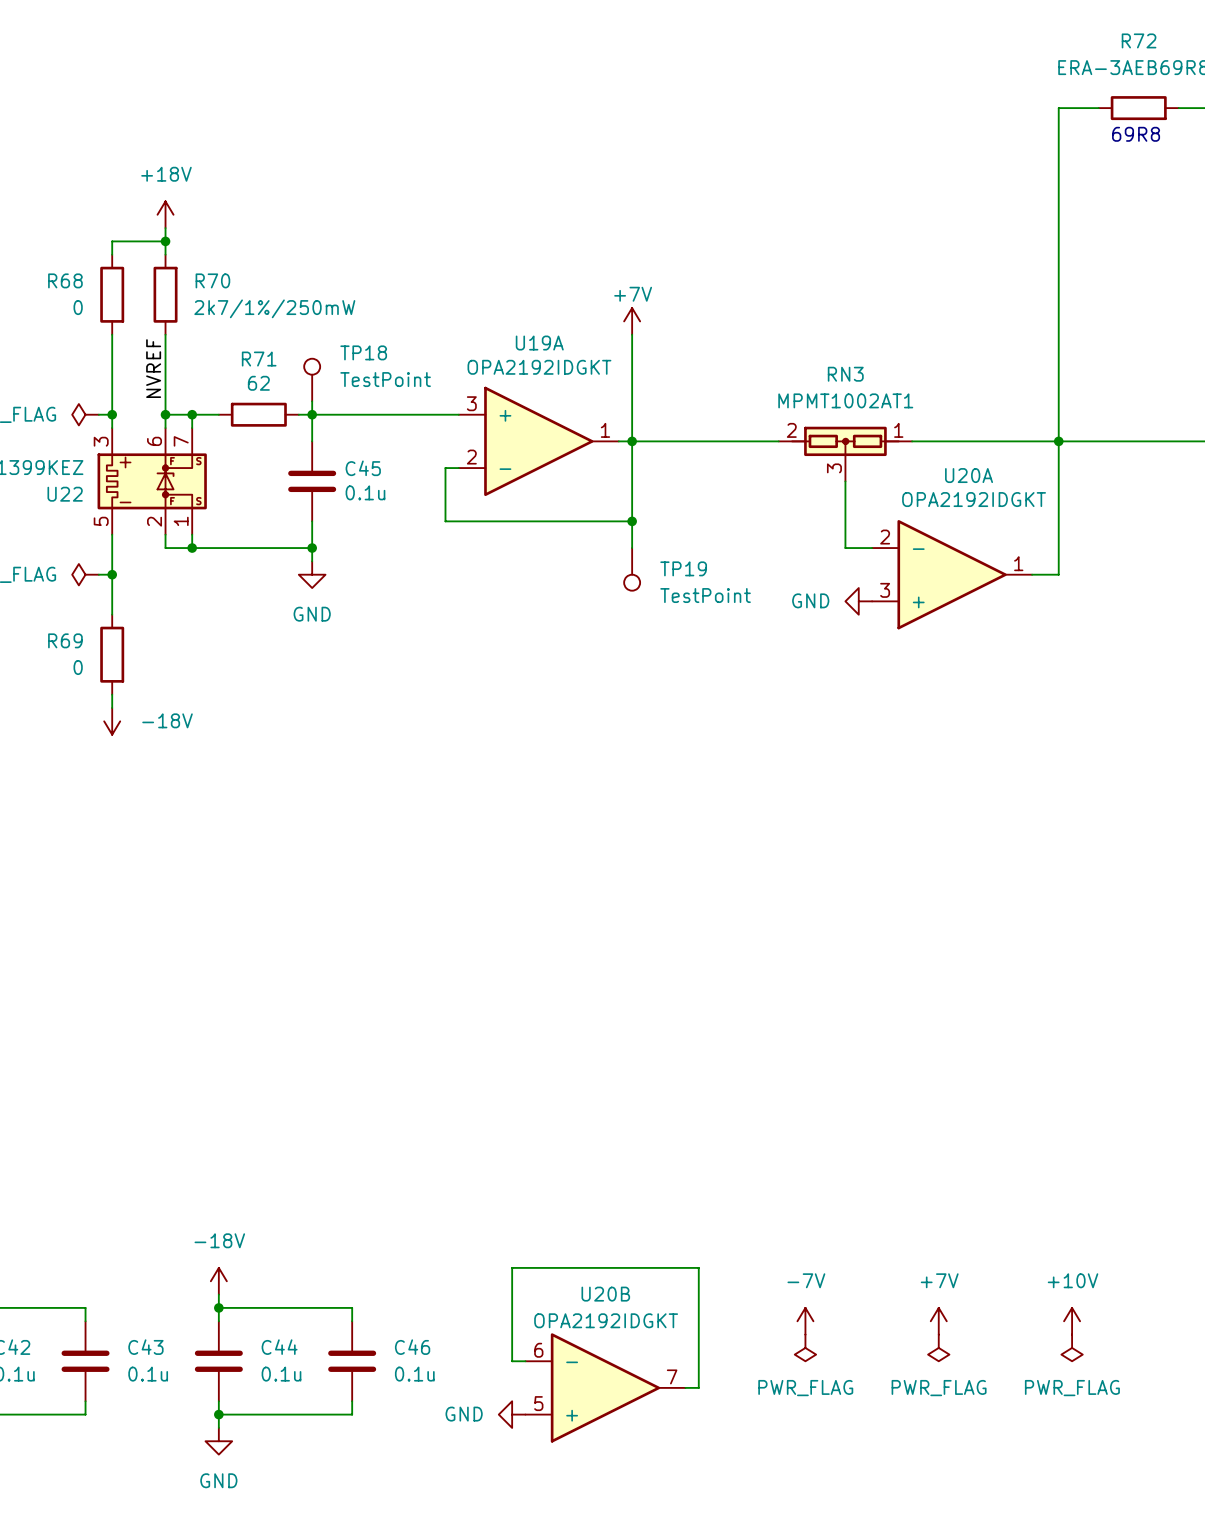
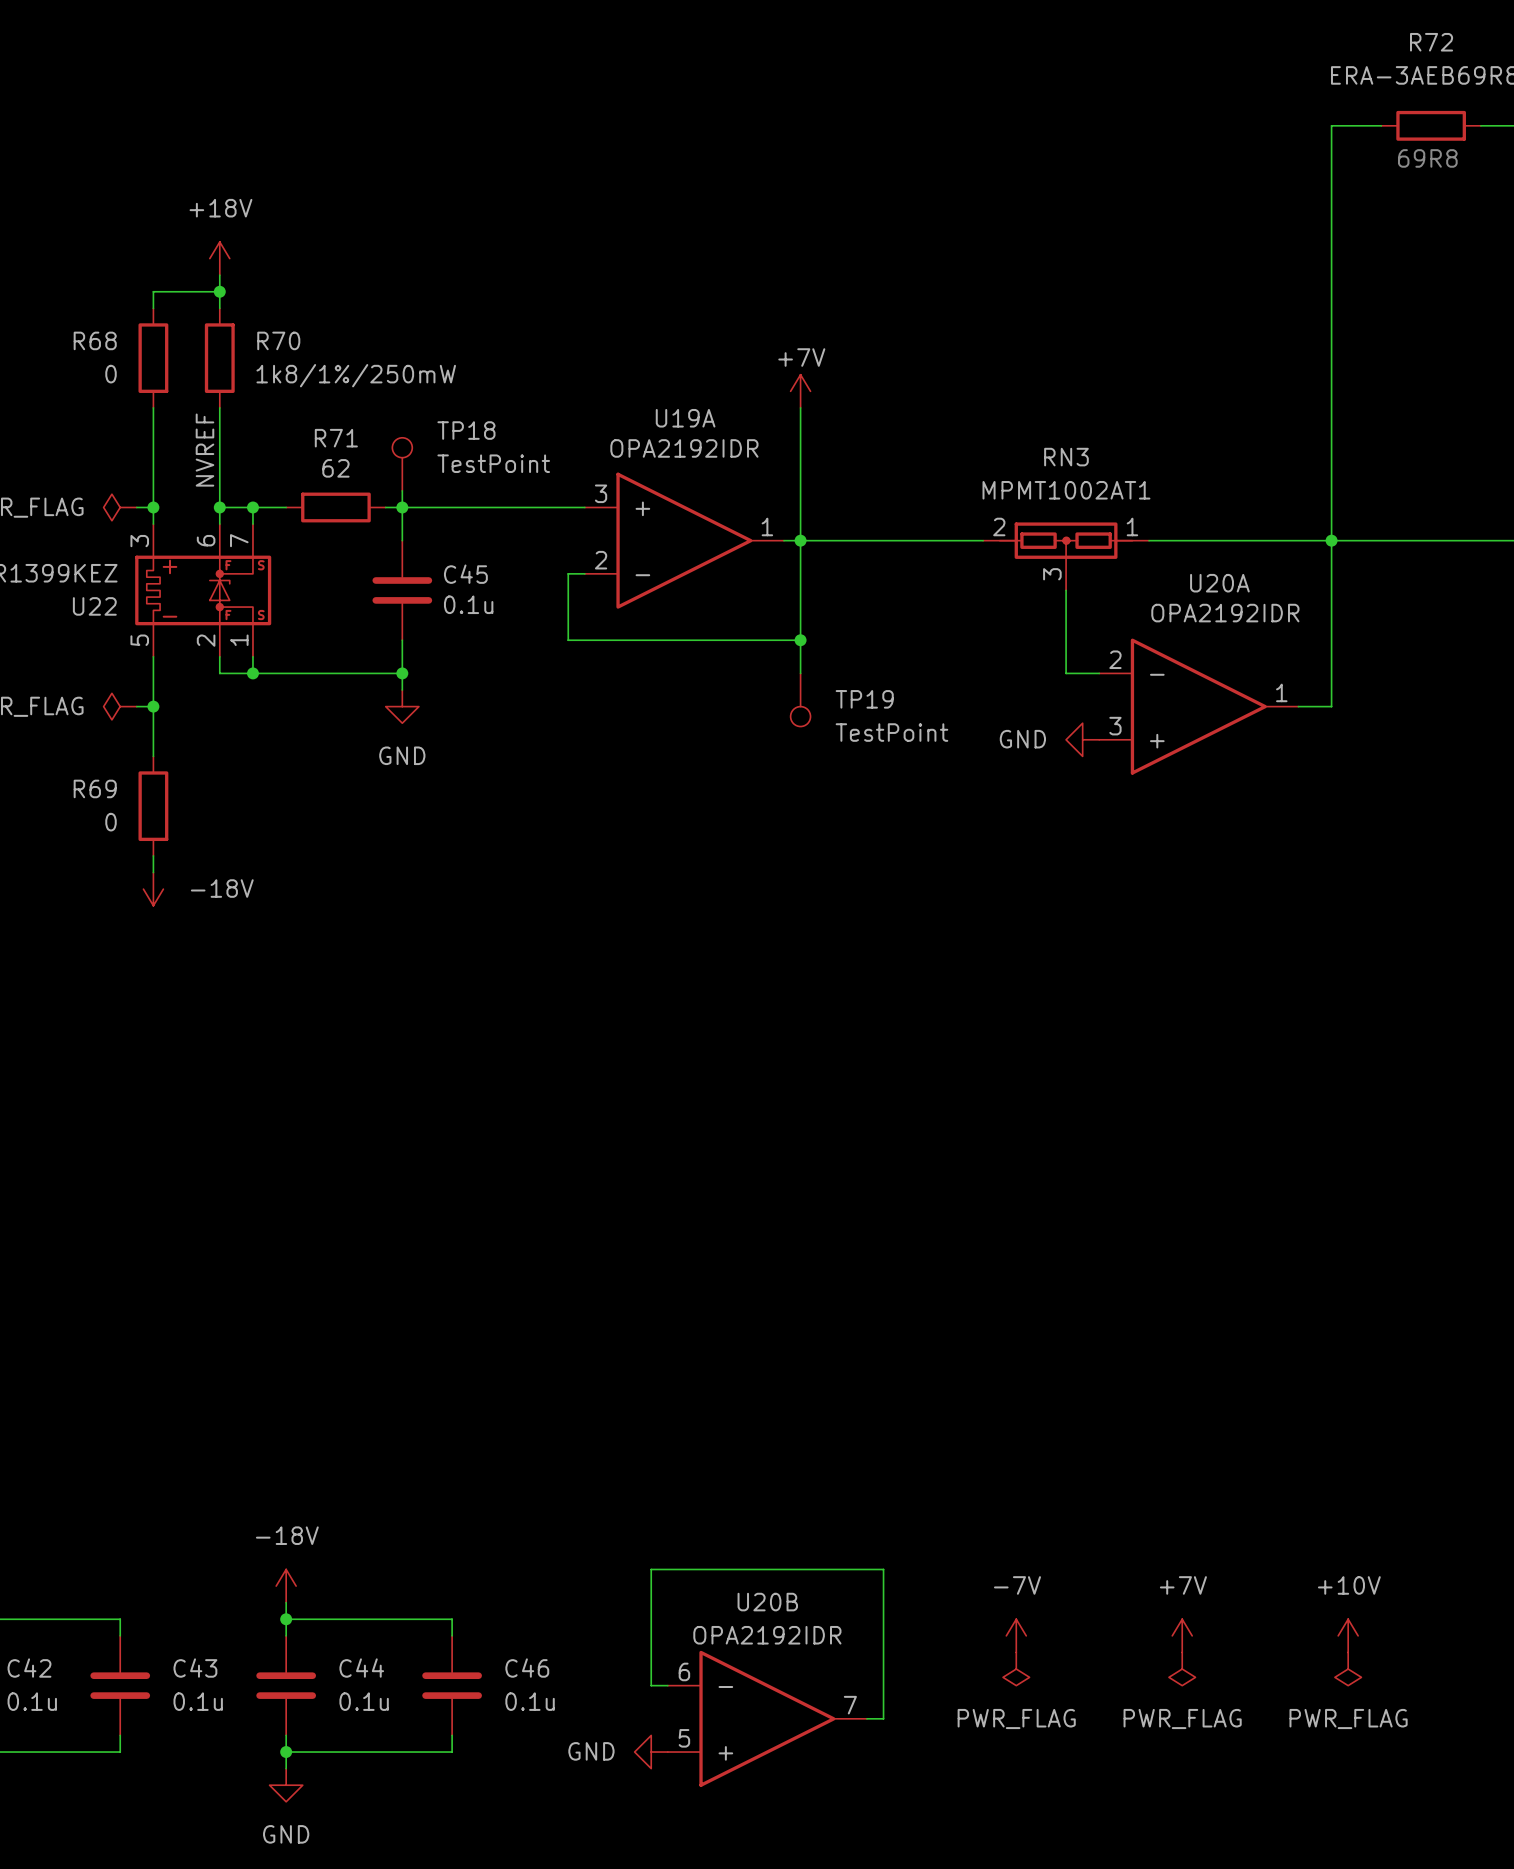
R70 value: 2k7/1%/250mW (274, 308) -> 1k8/1%/250mW (356, 375)
U19A value: OPA2192IDGKT (539, 367) -> OPA2192IDR (684, 448)
U20A value: OPA2192IDGKT (974, 499) -> OPA2192IDR (1225, 613)
U20B value: OPA2192IDGKT (606, 1320) -> OPA2192IDR (767, 1635)

